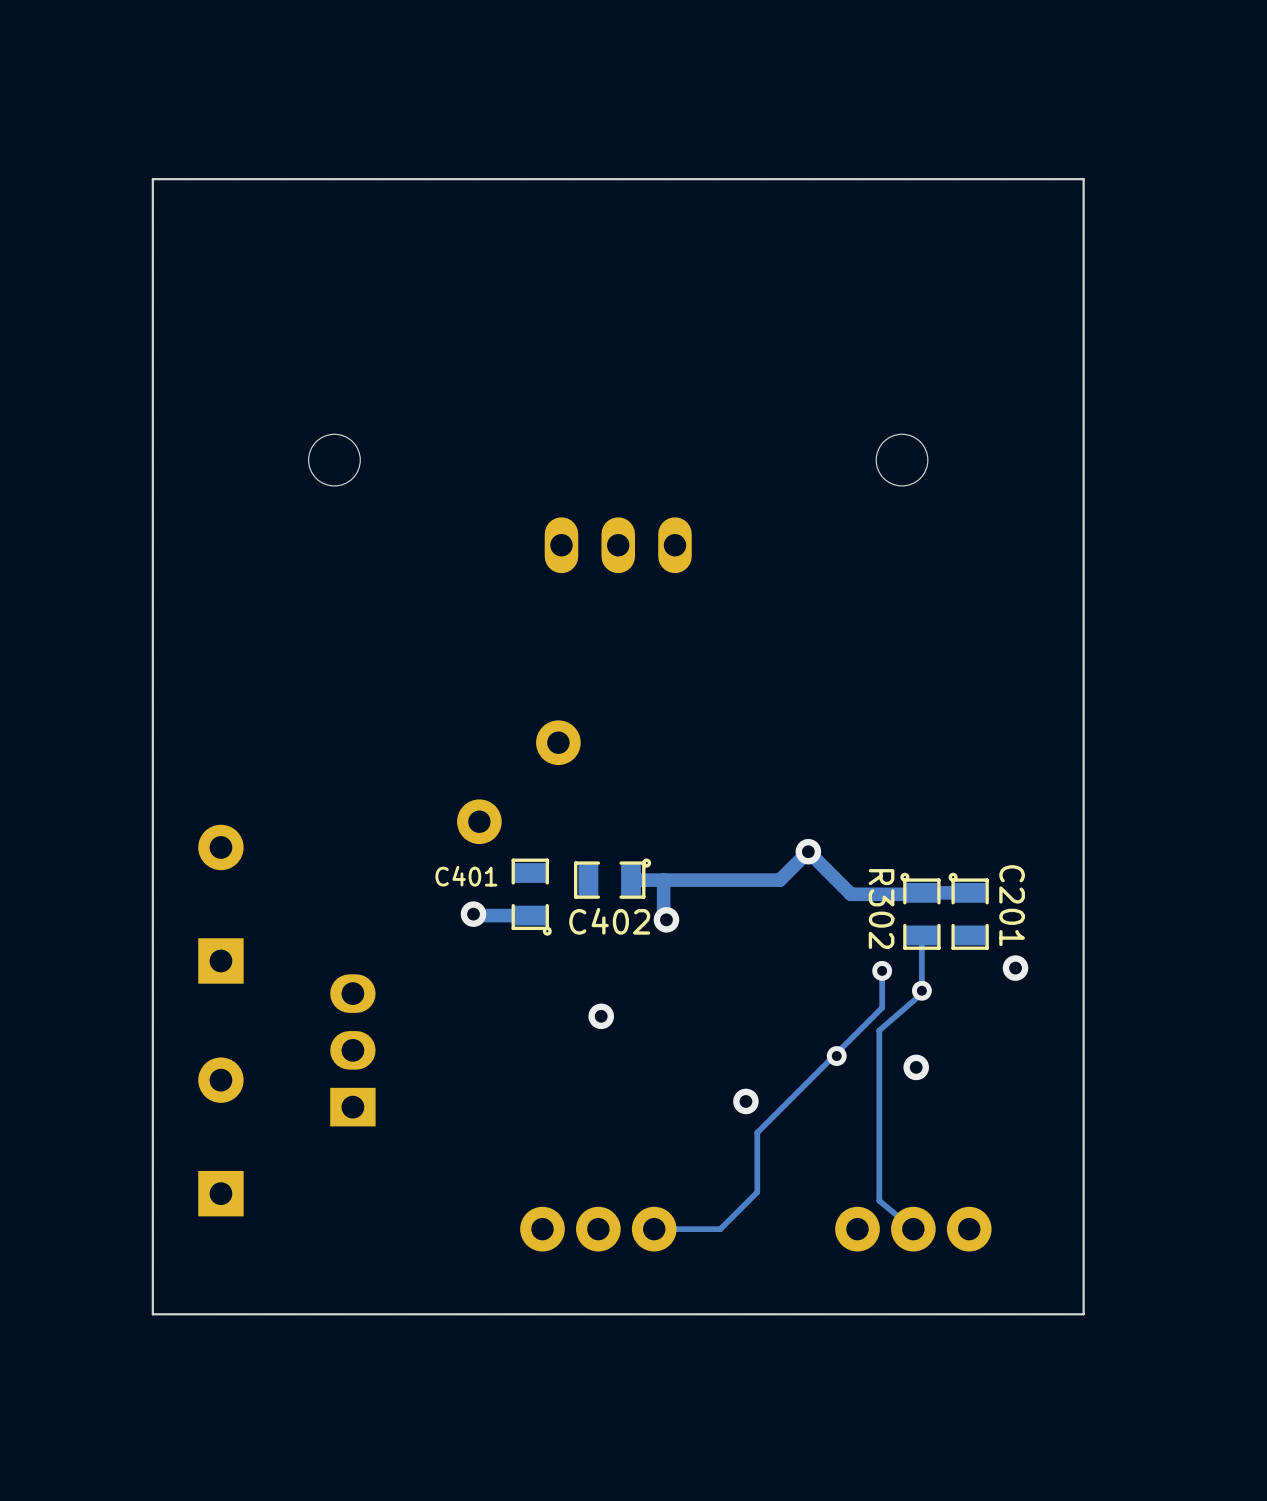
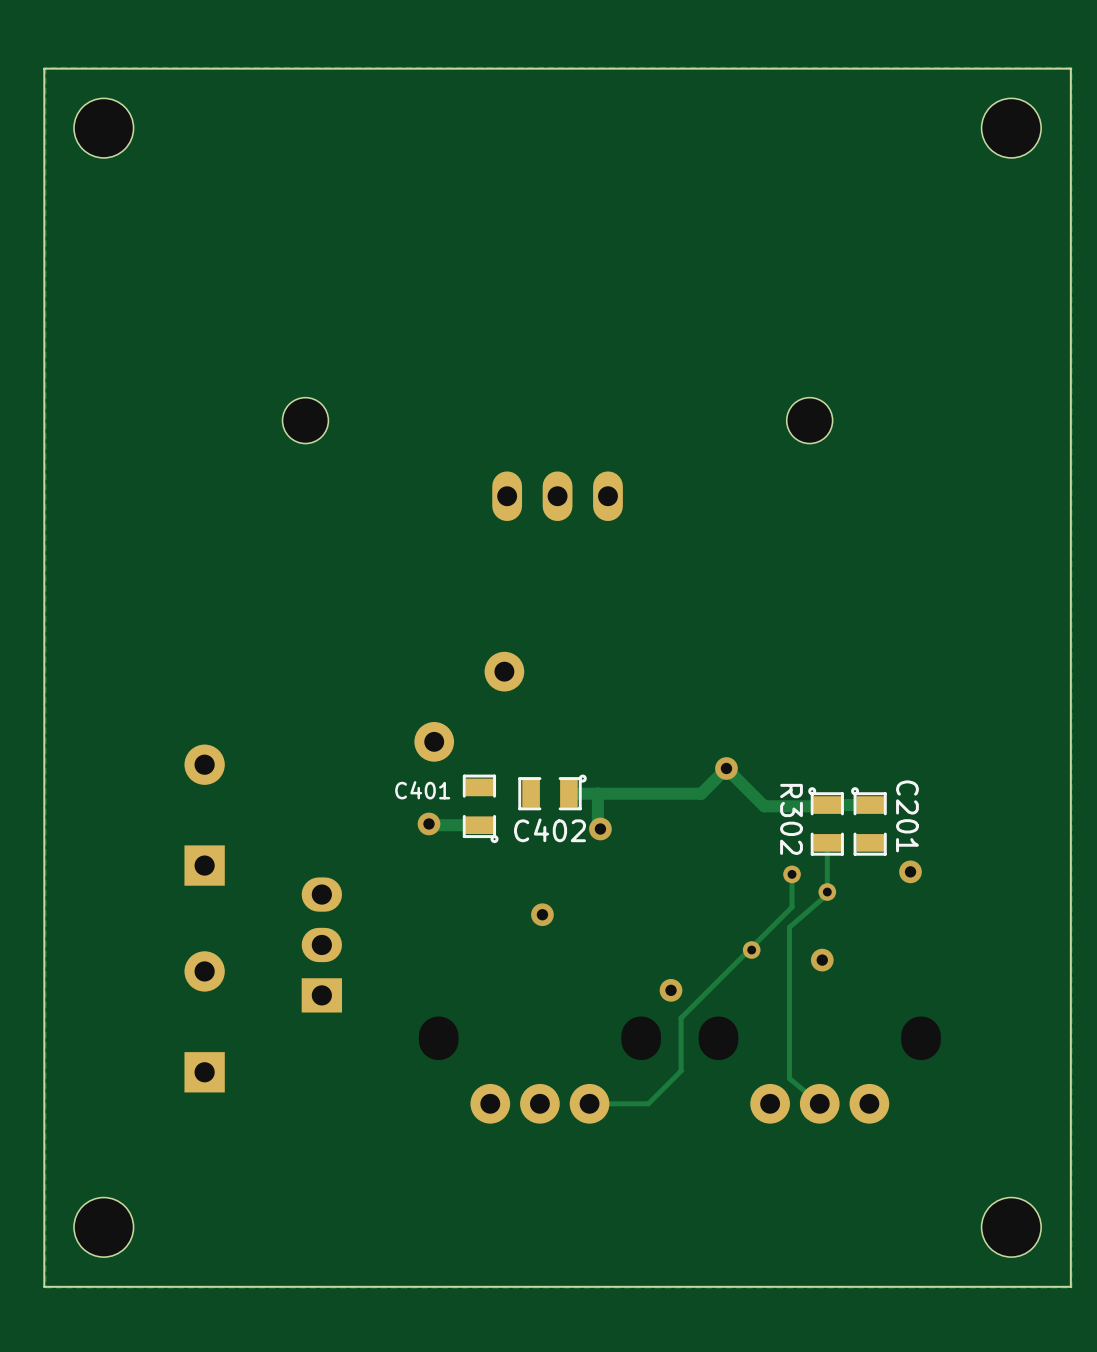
part: none -> (103, 128)
part: none -> (1011, 128)
board edge: (1083, 179) (1083, 1314) (152, 1314) (152, 179) (1083, 179) -> (1070, 68) (1070, 1286) (44, 1286) (44, 68) (1070, 68)
part: none -> (103, 1227)
part: none -> (1011, 1227)

